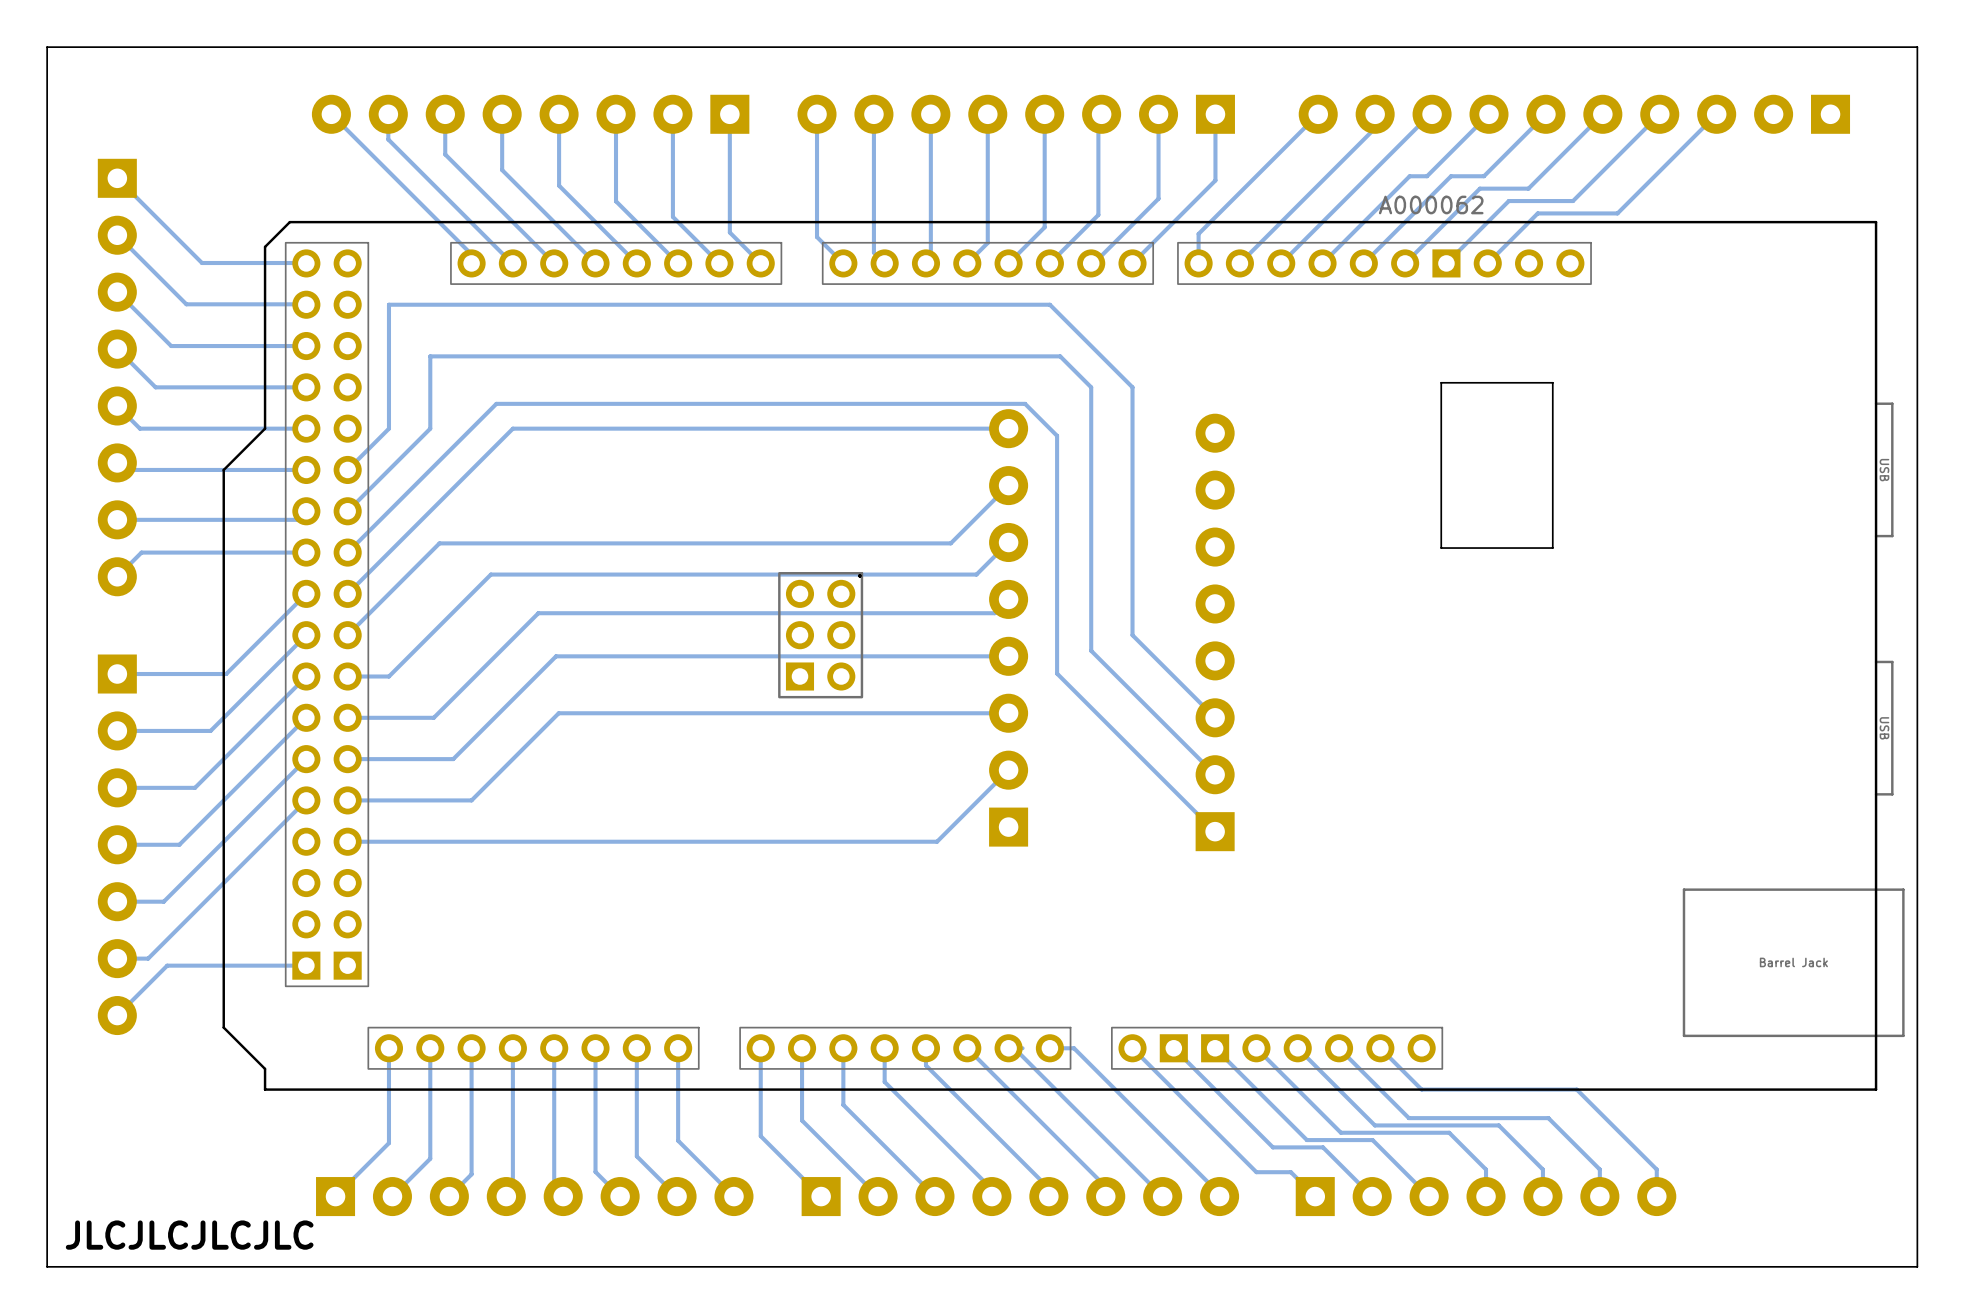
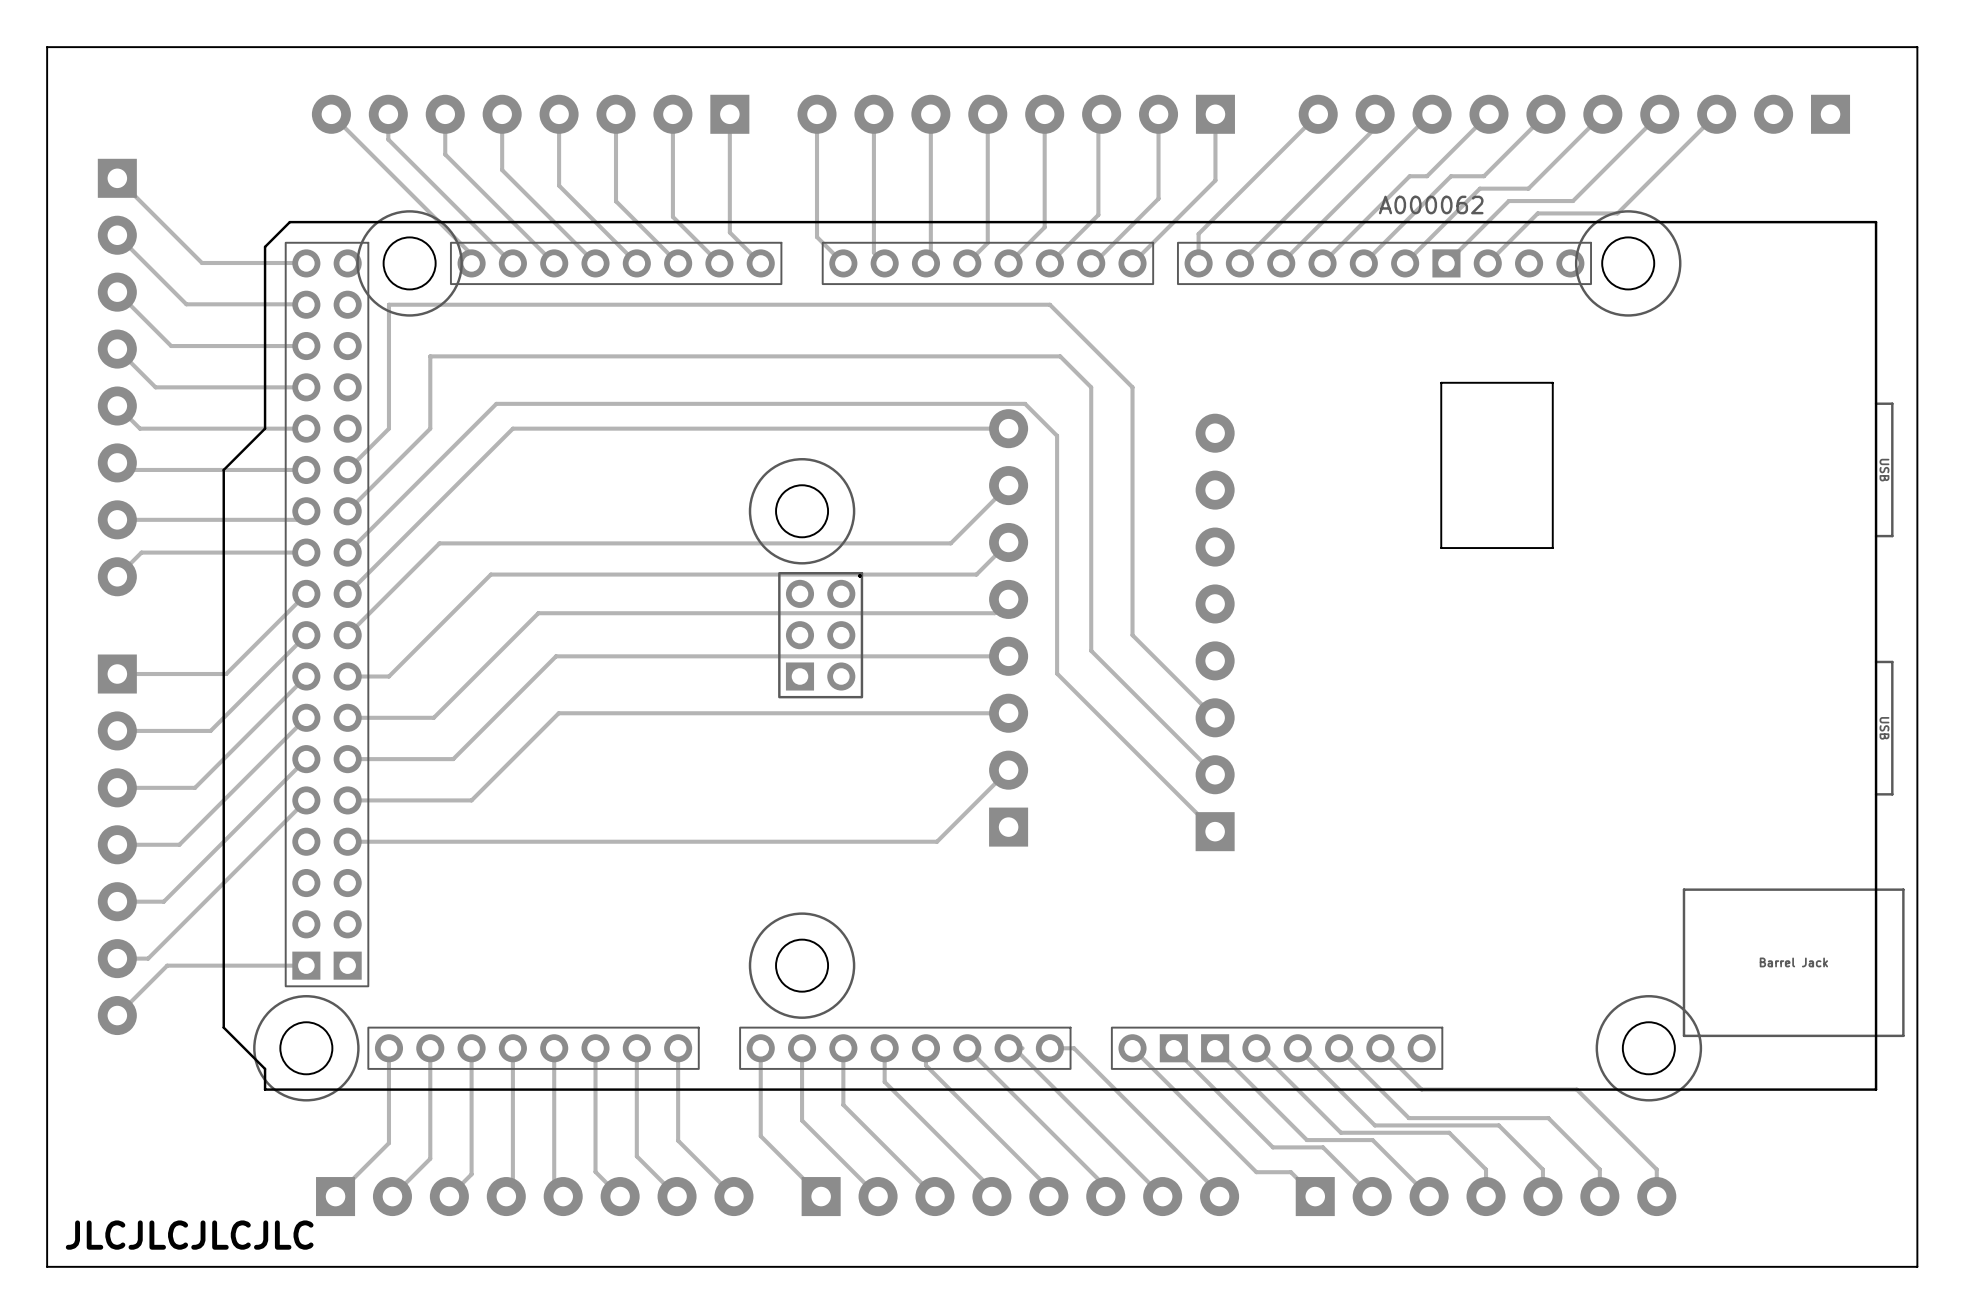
part footprint: [222, 220, 1905, 1091] -> [222, 210, 1905, 1102]

